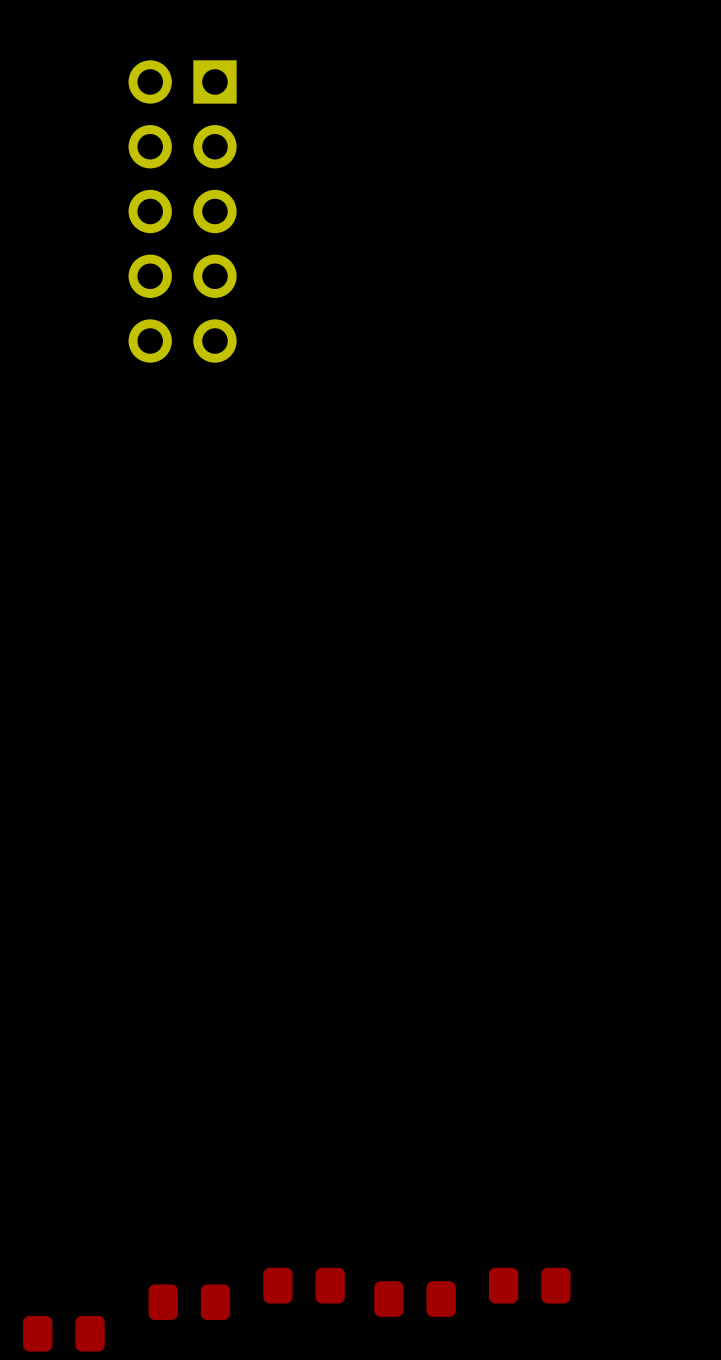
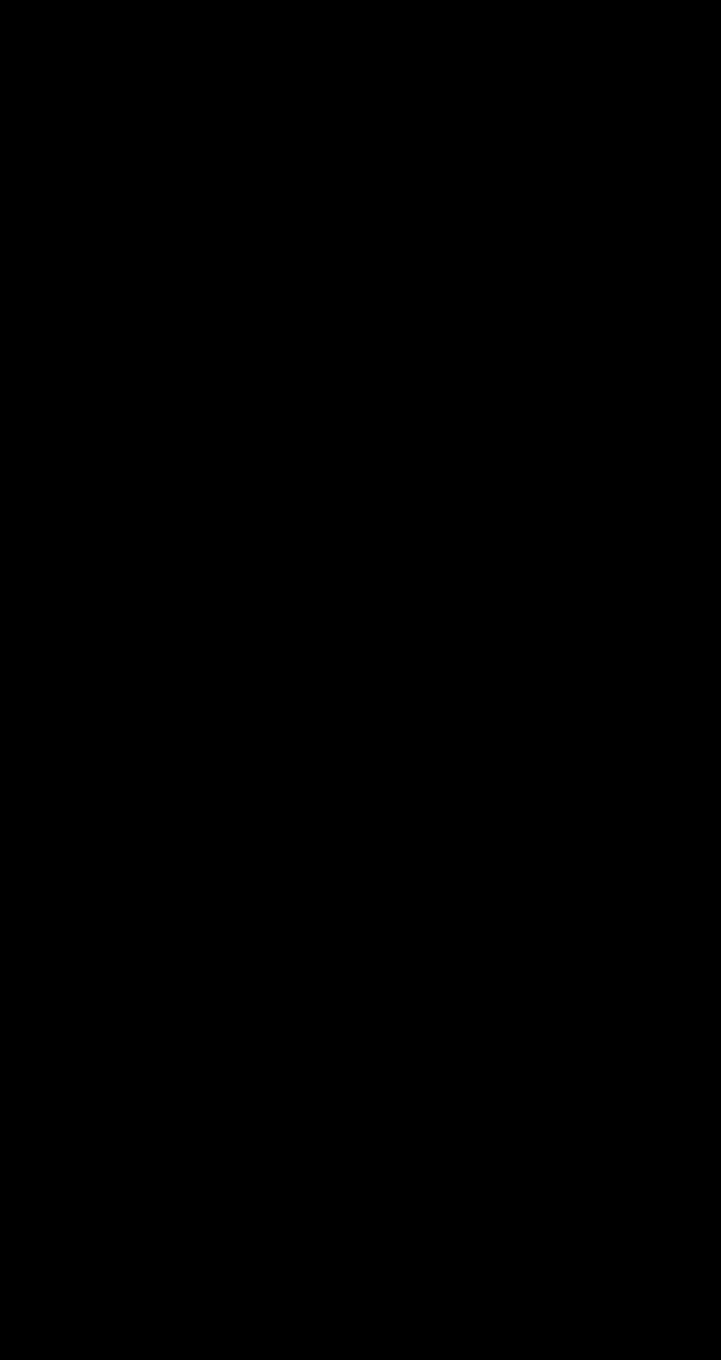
part: (182, 211) -> none
part: (304, 1285) -> none
part: (529, 1285) -> none
part: (414, 1299) -> none
part: (189, 1302) -> none
part: (63, 1333) -> none

